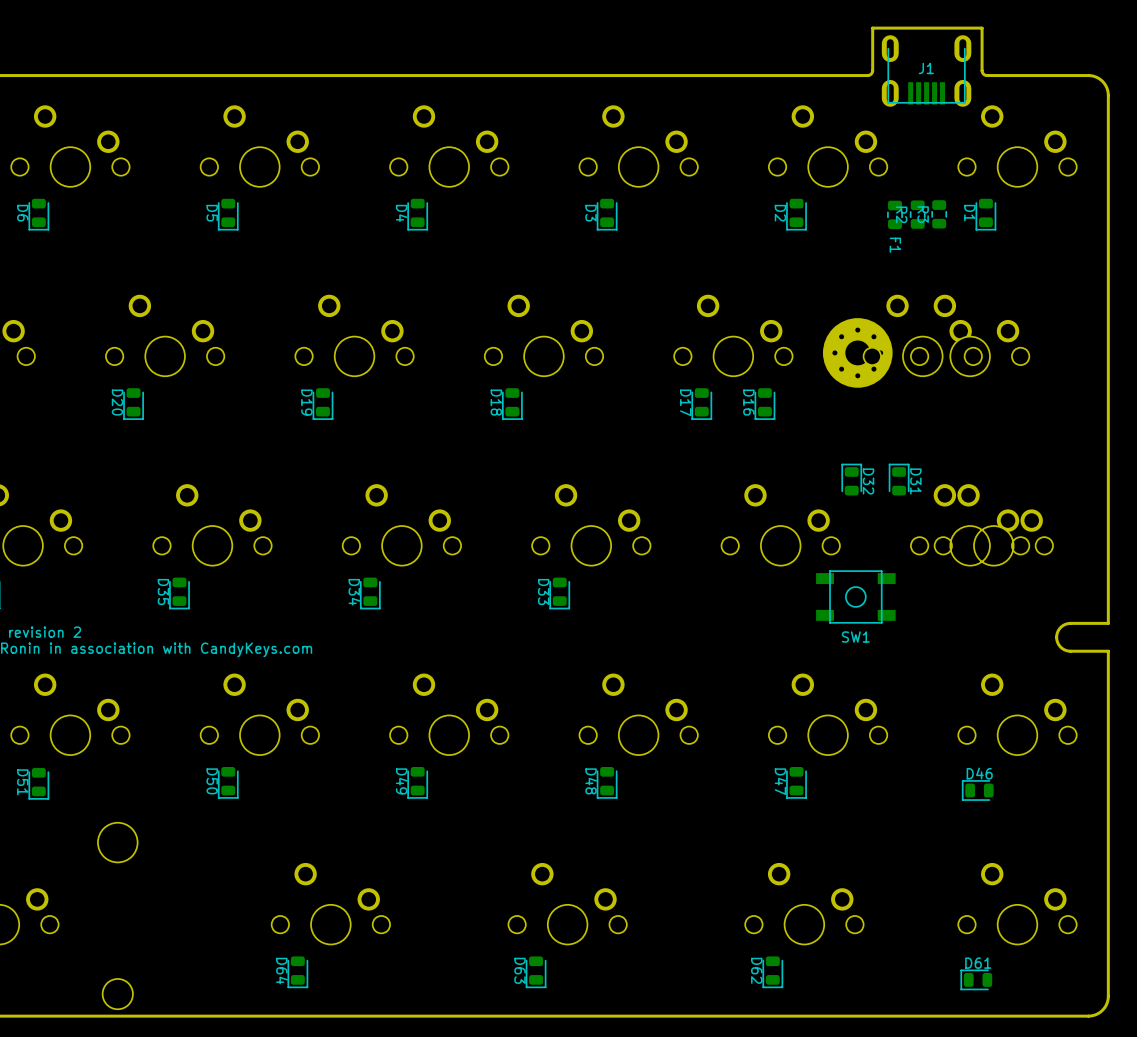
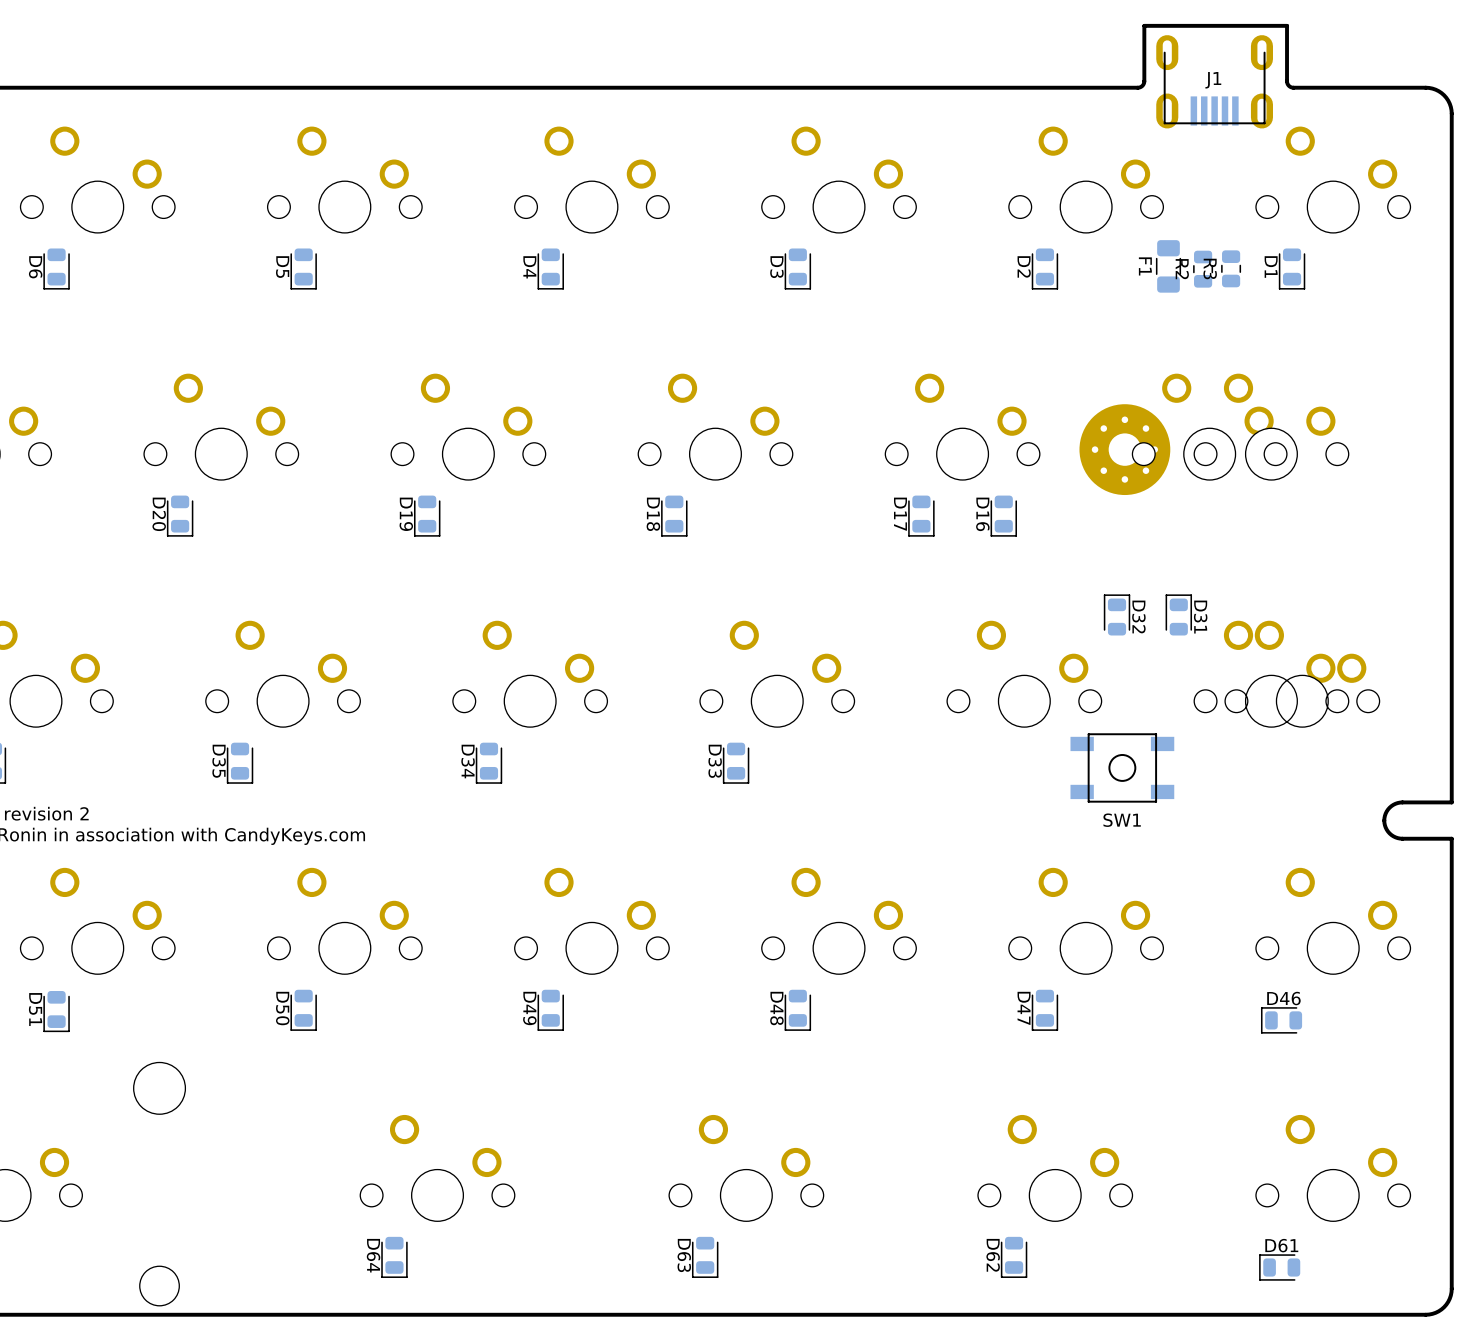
F1 footprint: [887, 200, 903, 230] -> [1155, 240, 1182, 293]
F1 name position: F1 (895, 245) -> F1 (1145, 266)

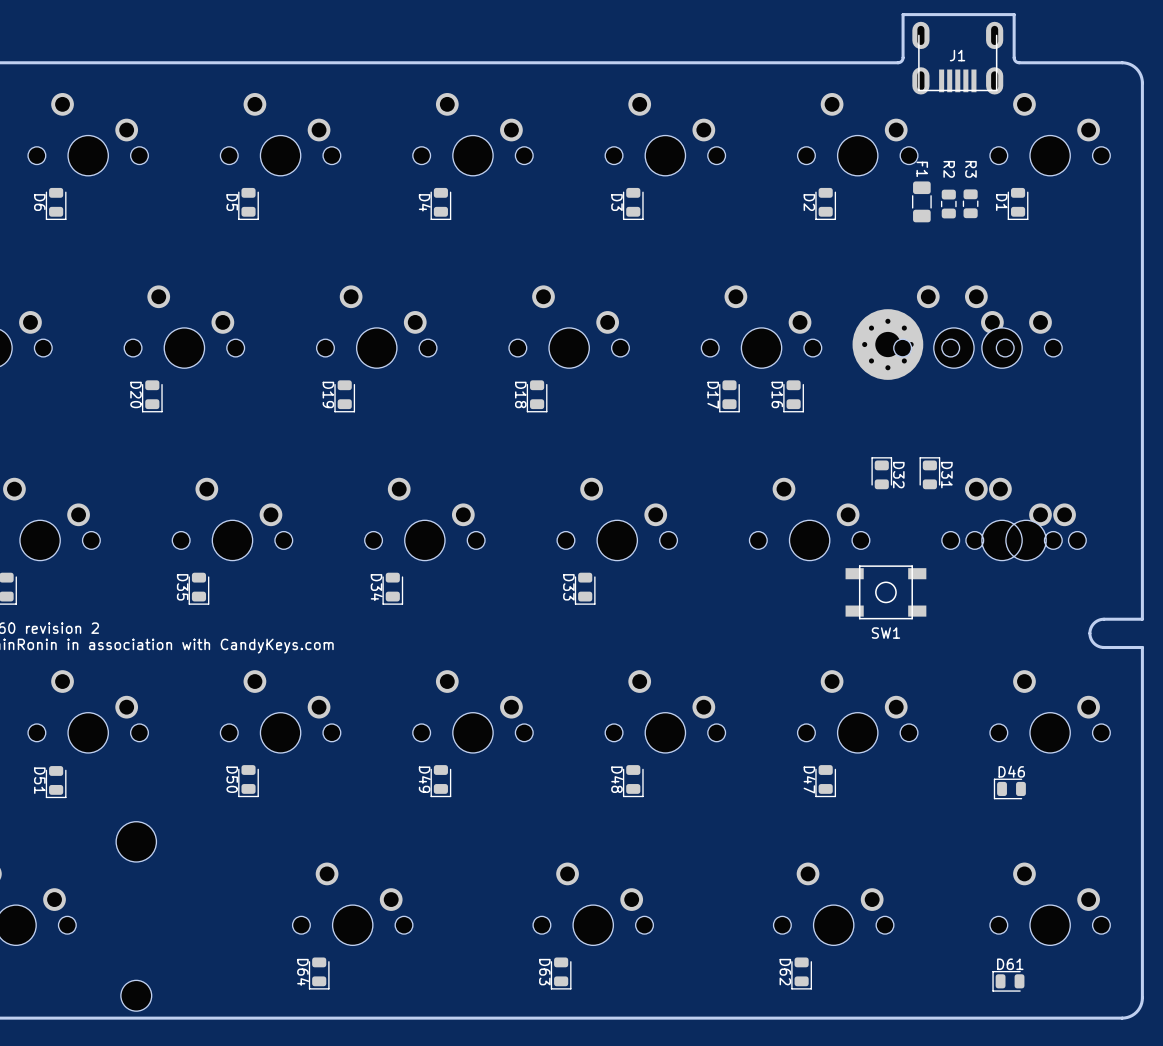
F1 name position: F1 (1145, 266) -> F1 (922, 169)
R3 name position: R3 (1210, 268) -> R3 (970, 169)
R2 name position: R2 (1182, 269) -> R2 (949, 169)

